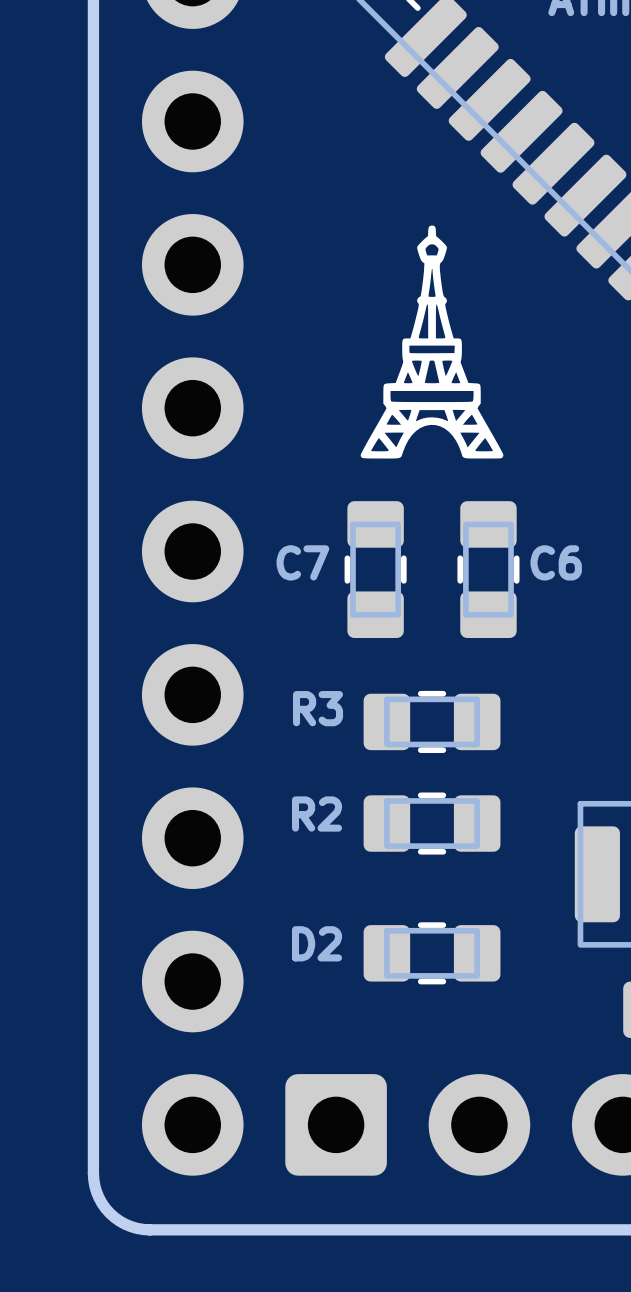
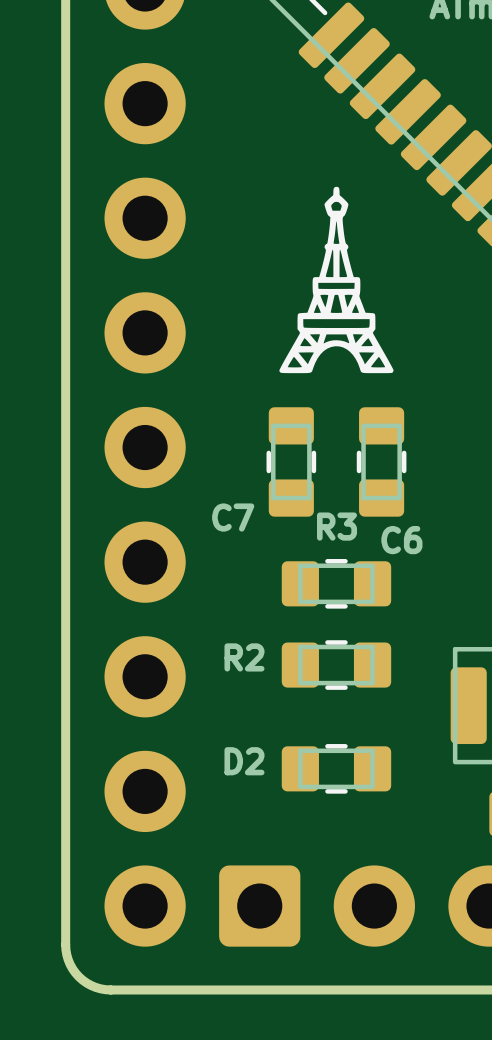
C7 name position: C7 (302, 562) -> C7 (233, 517)
C6 name position: C6 (556, 562) -> C6 (401, 540)
R3 name position: R3 (318, 708) -> R3 (337, 526)

